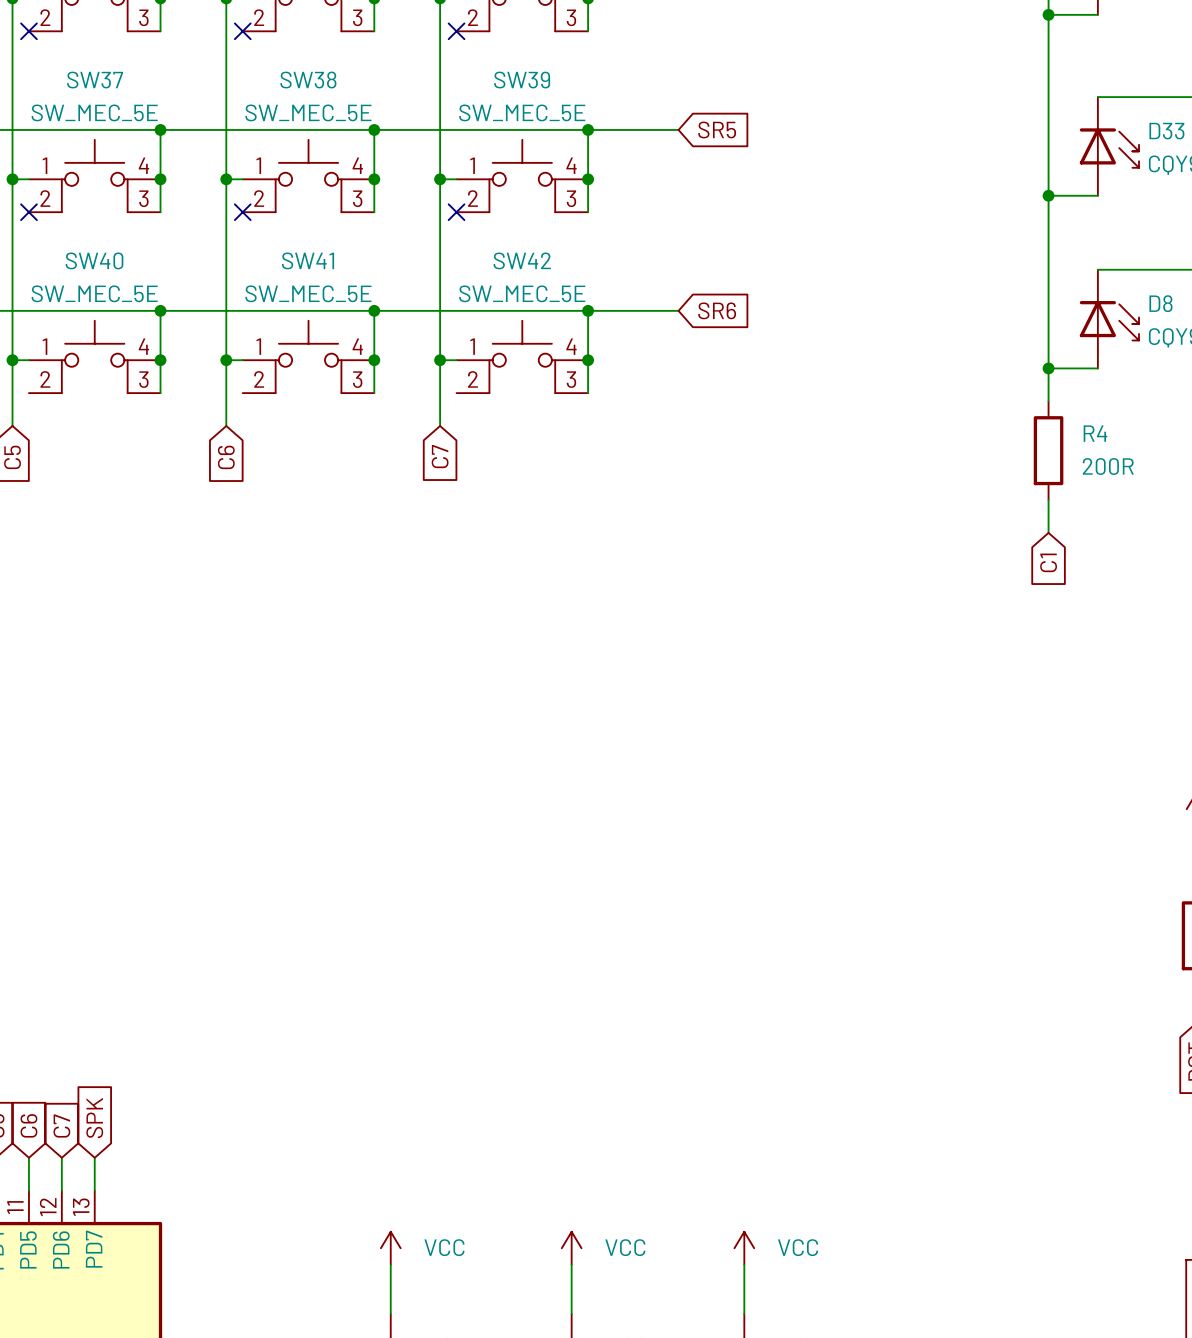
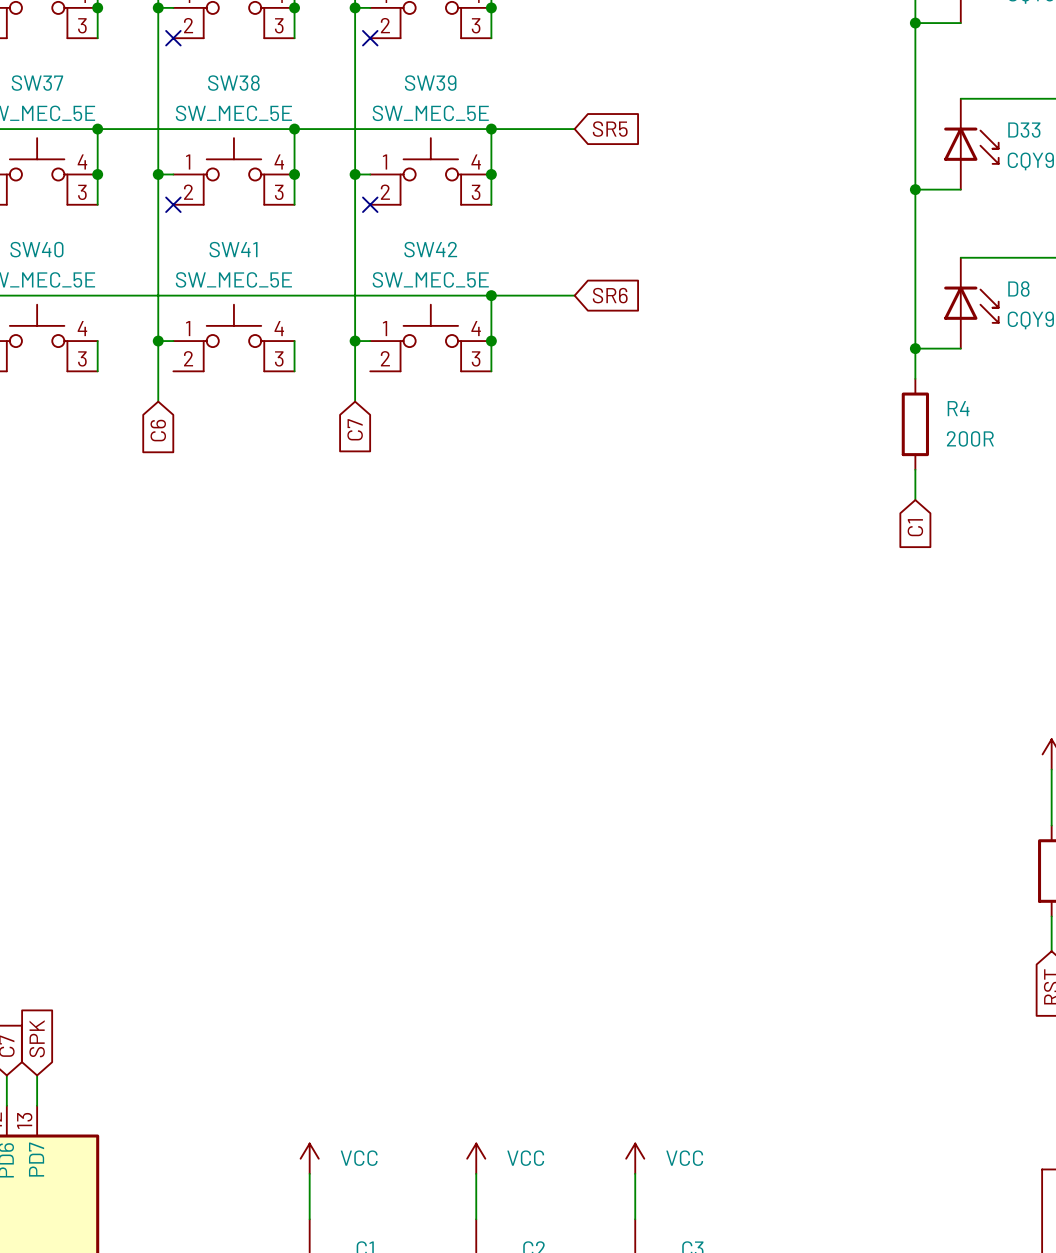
wire: (160, 310) (160, 360) -> none
junction: (160, 310) -> none
wire: (374, 310) (374, 360) -> none
junction: (374, 310) -> none
junction: (160, 360) -> none
junction: (374, 360) -> none

